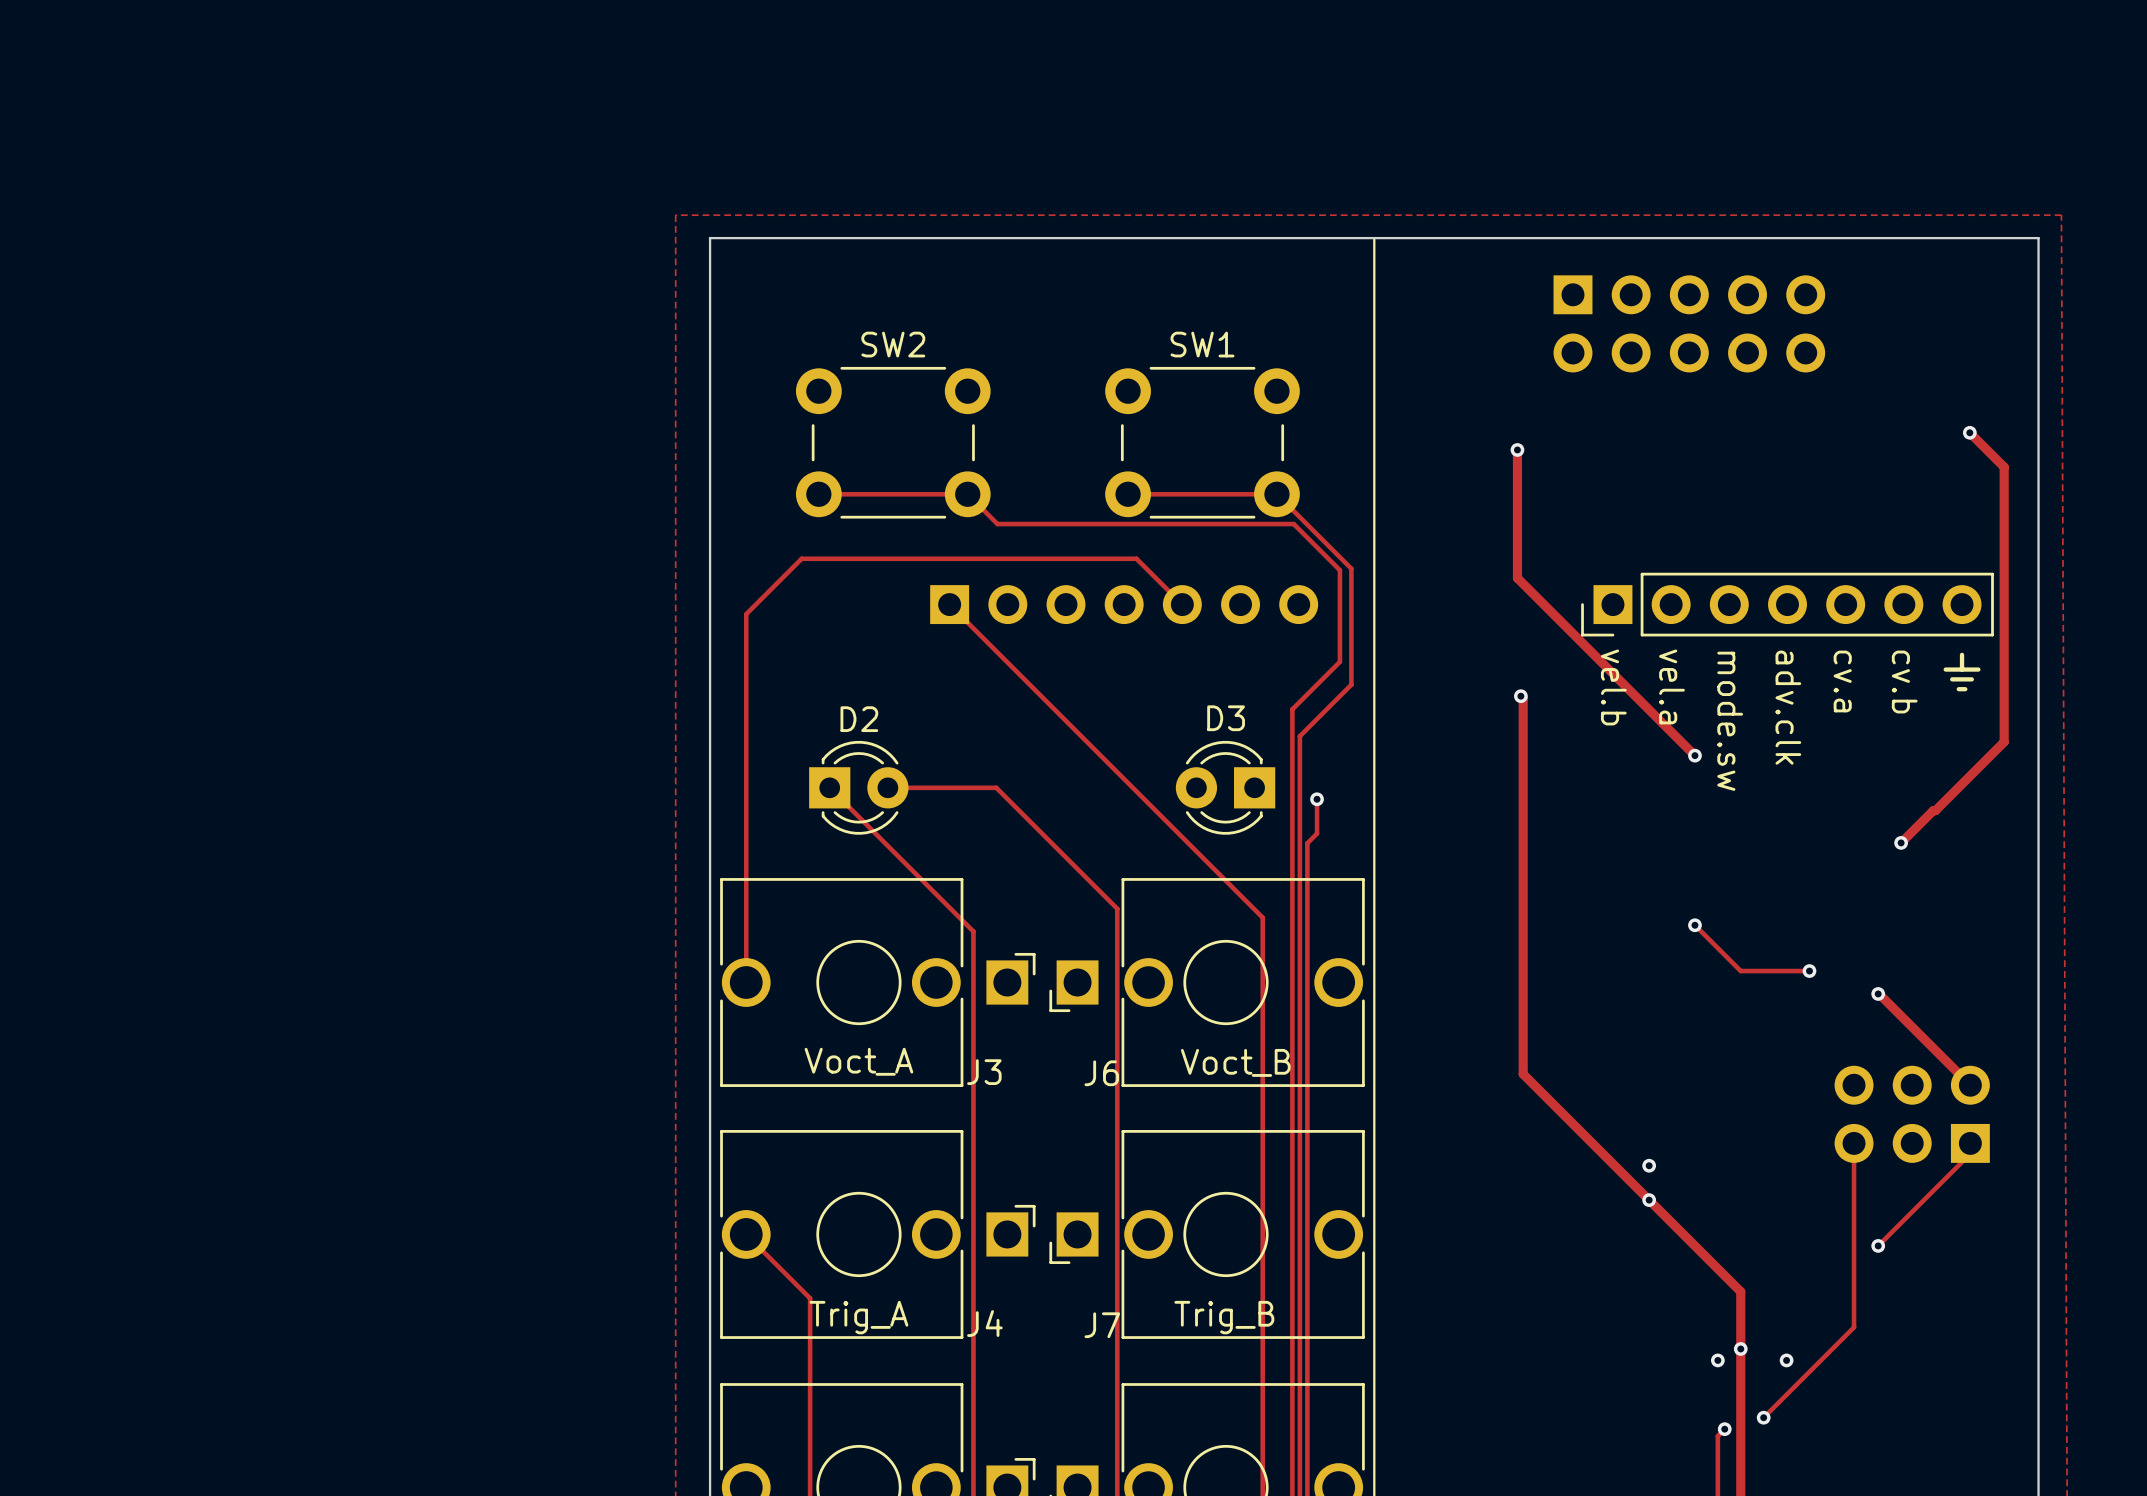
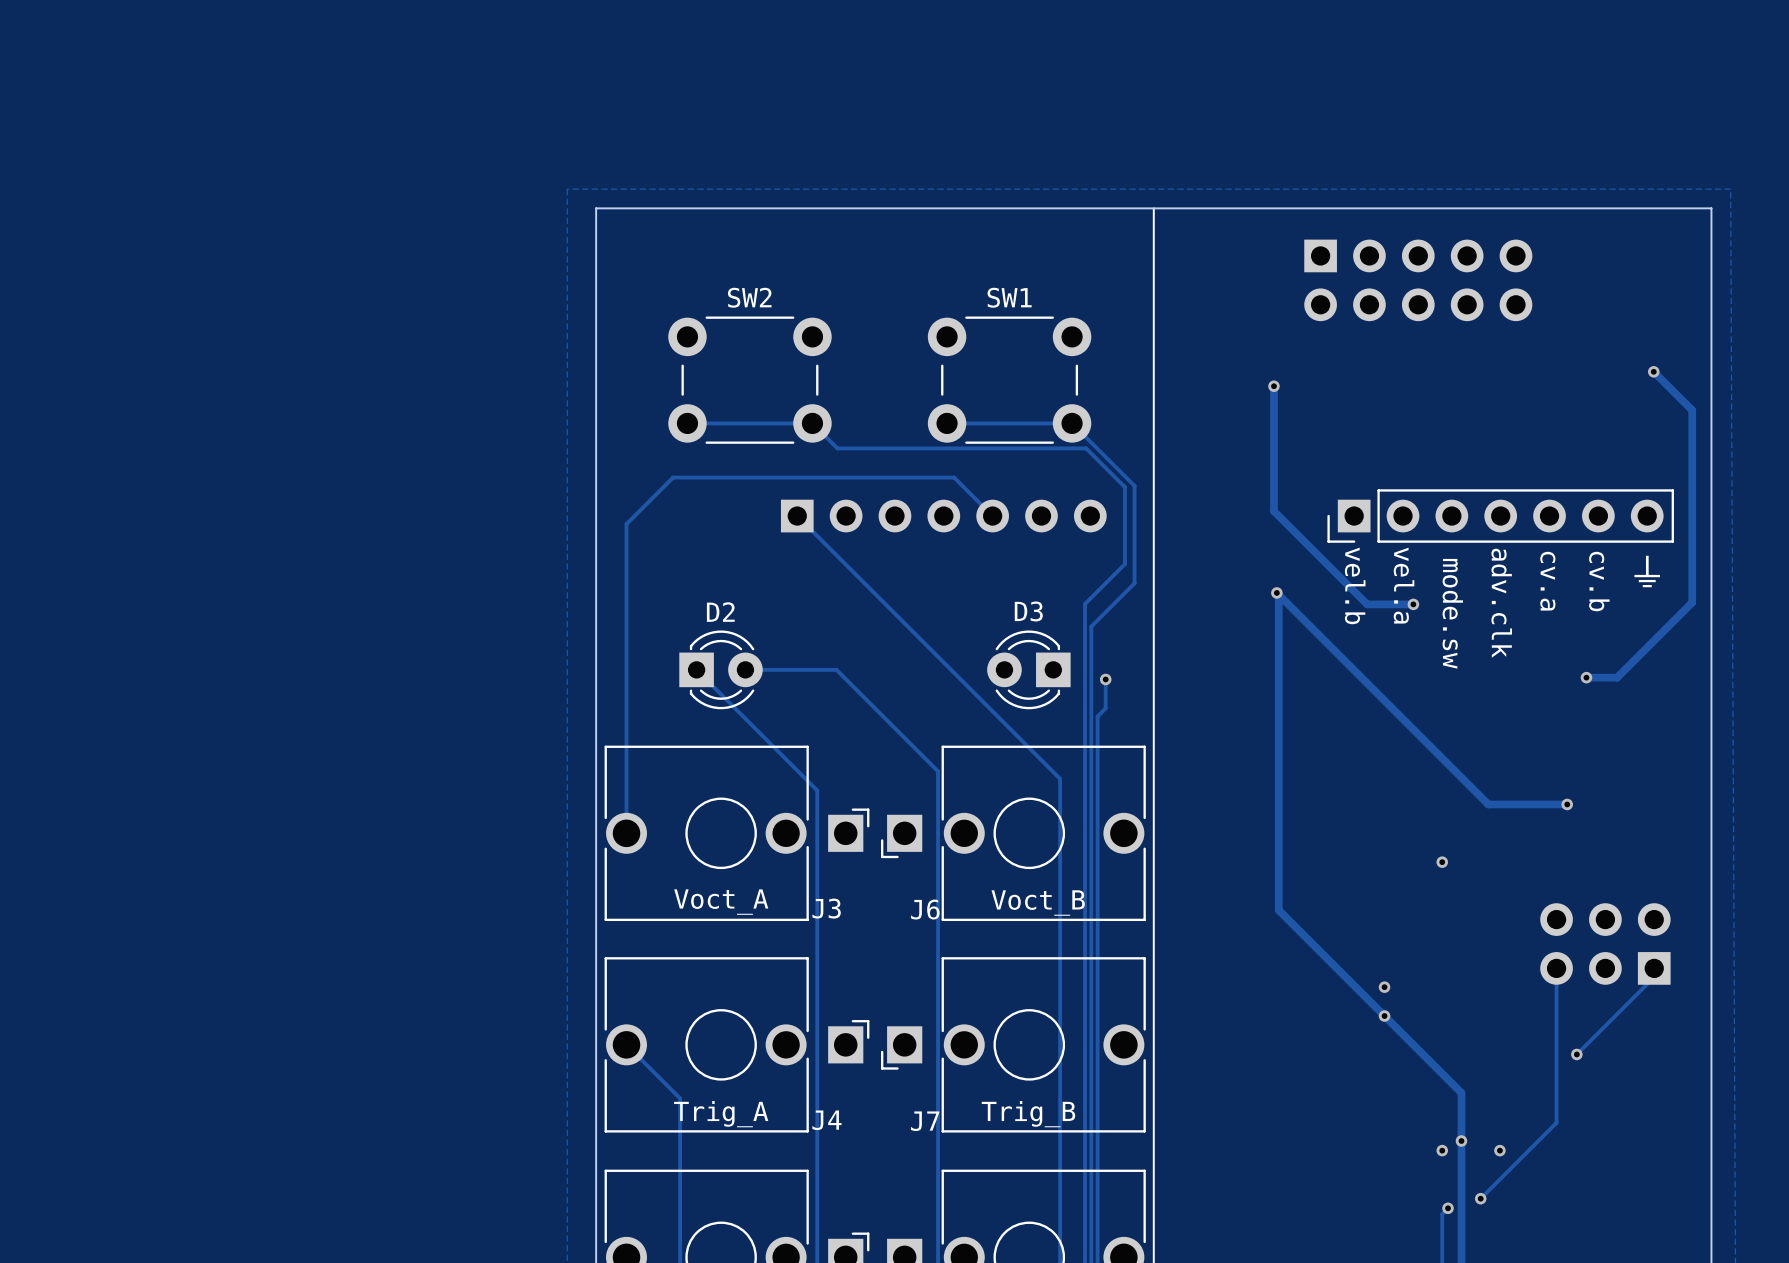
track: (2004, 467) (2004, 742) (1901, 842) -> (1682, 400) (1692, 410) (1692, 602) (1617, 677) (1586, 677)
track: (1517, 578) (1694, 755) -> (1273, 493) (1273, 511) (1367, 604) (1413, 604)
track: none -> (1278, 594) (1488, 804) (1567, 804)
via position: (1694, 755) -> (1413, 604)
via position: (1901, 842) -> (1586, 677)
track: (1694, 925) (1740, 971) (1809, 971) -> none
via: (1694, 925) -> none
via: none -> (1567, 804)
via: (1809, 971) -> none
track: (1878, 993) (1970, 1085) -> none
via: (1878, 993) -> none
via: none -> (1442, 862)

